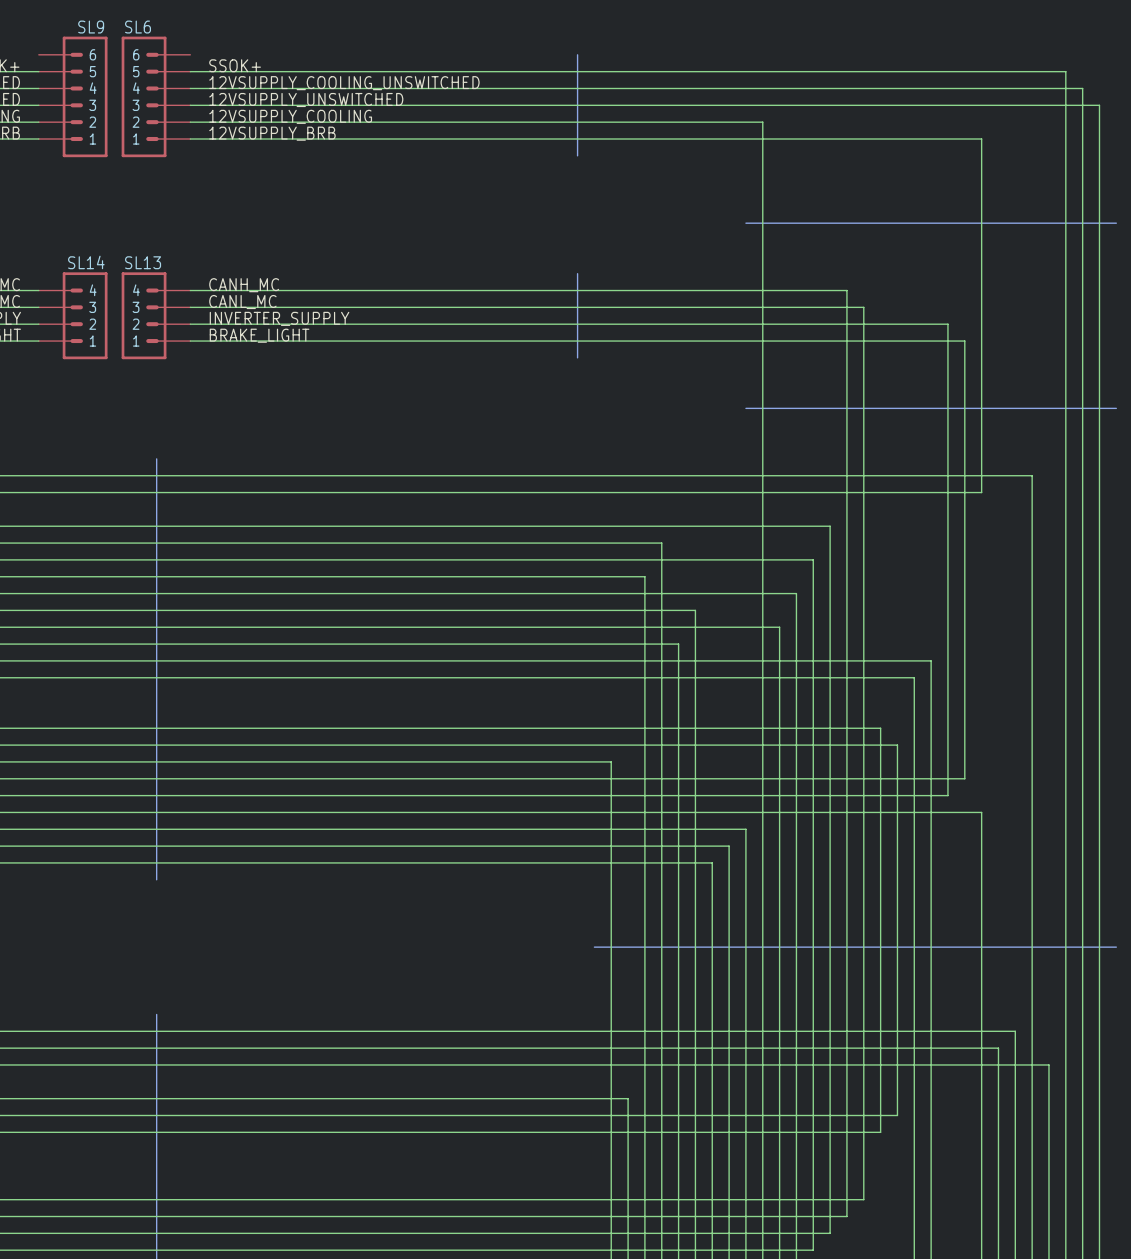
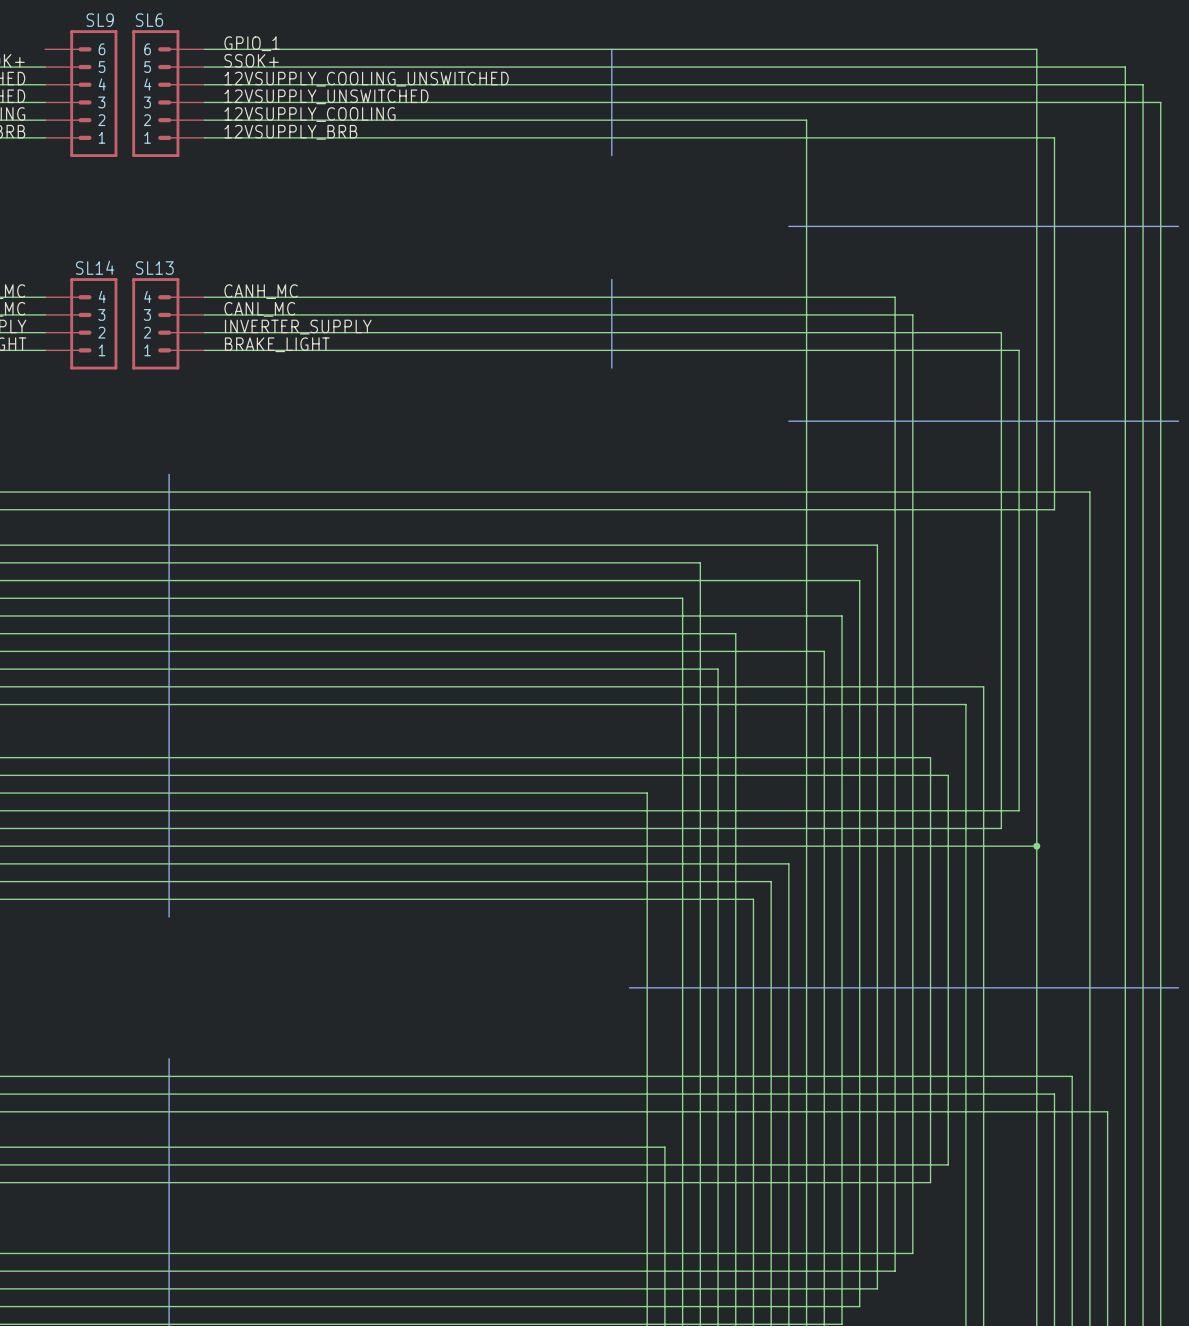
label: none -> GPIO_1 (252, 43)
wire: none -> (204, 49) (1036, 49) (1036, 137) (1054, 137) (1054, 509) (1036, 509) (1036, 846)
junction: none -> (1036, 846)

